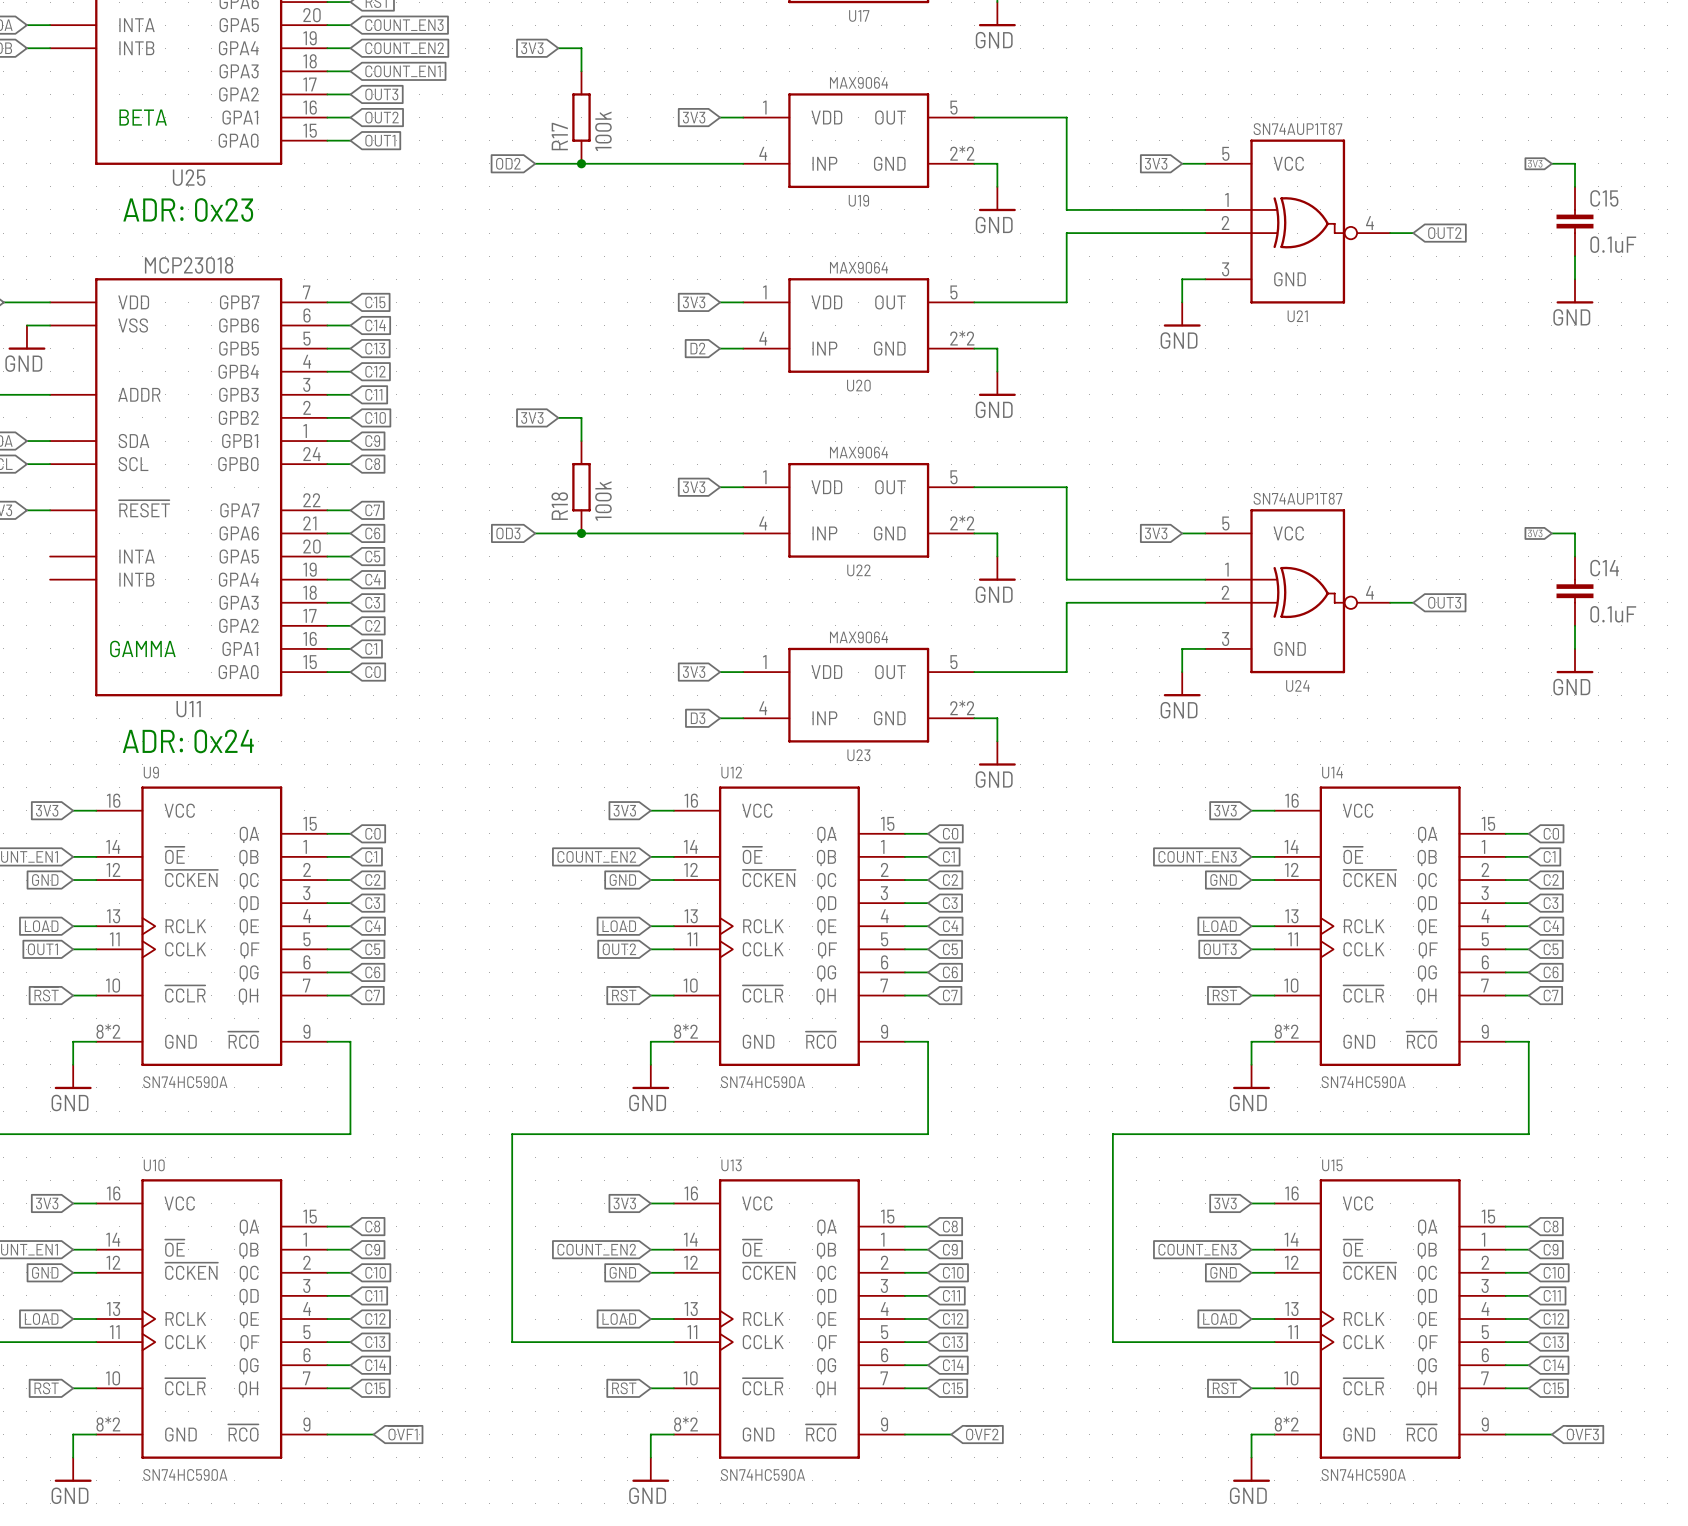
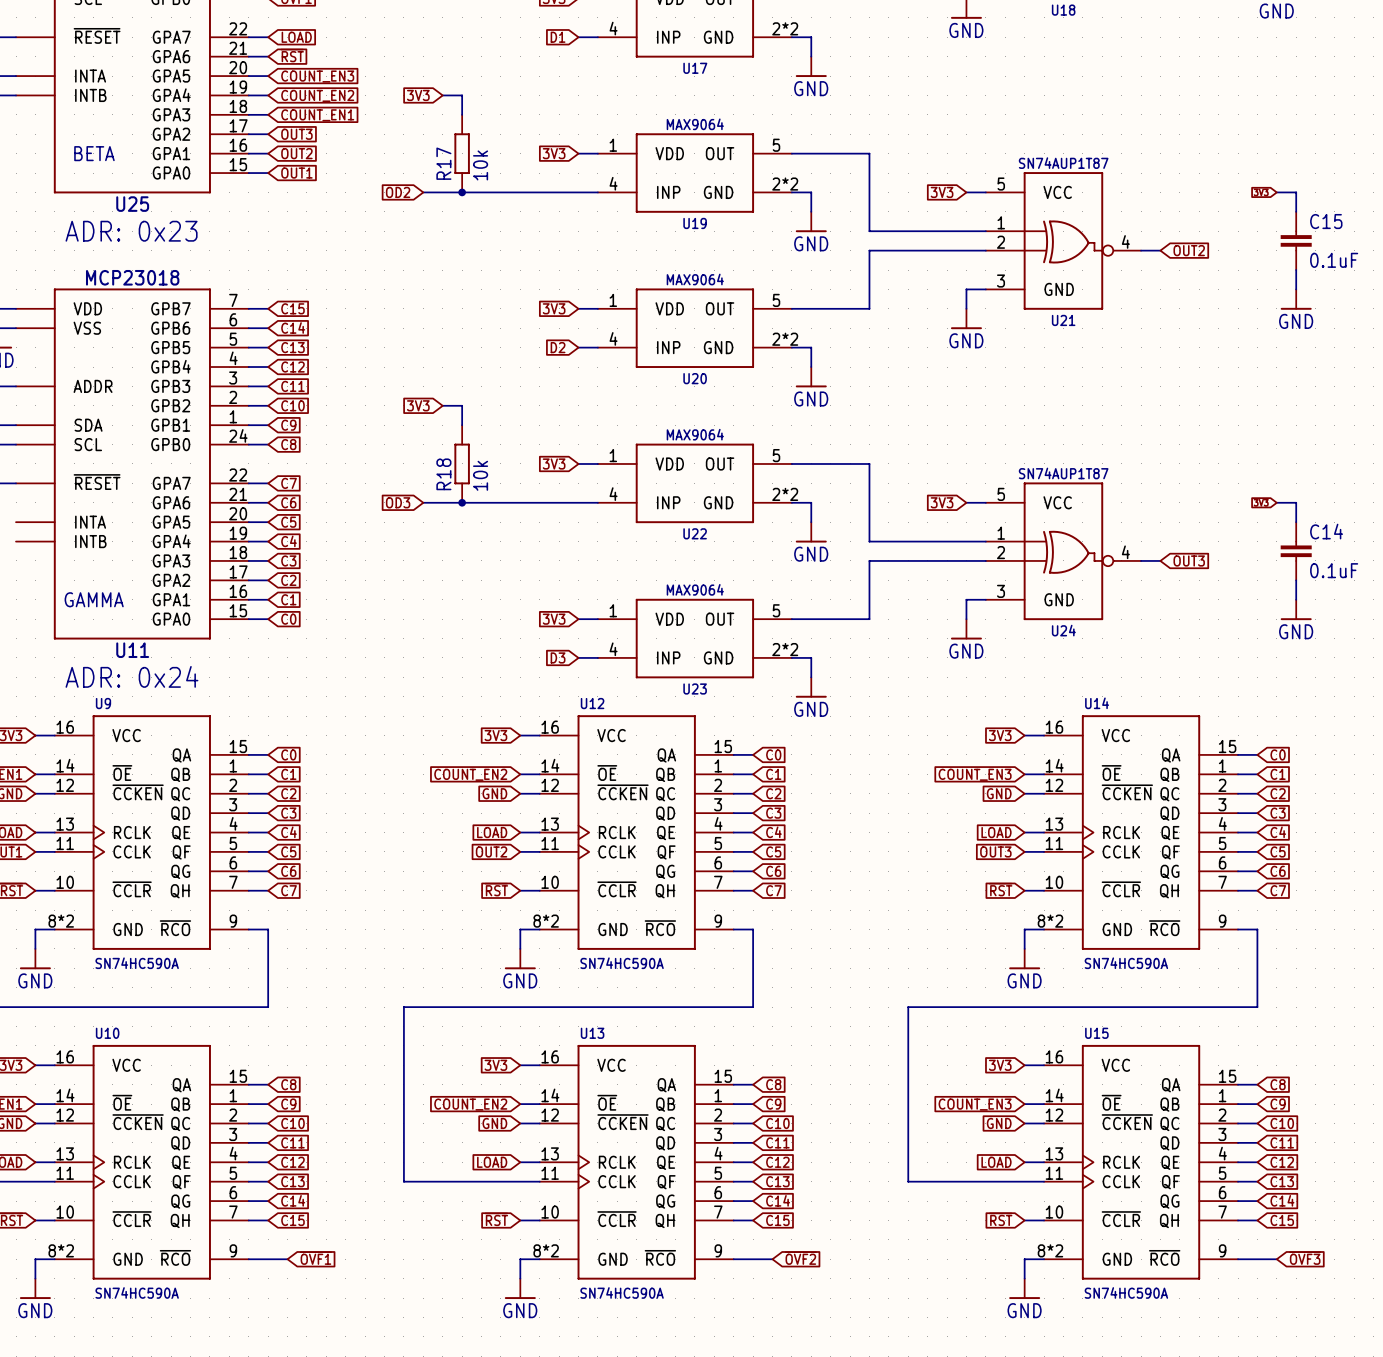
R17 value: 100k (603, 131) -> 10k (480, 165)
R18 value: 100k (603, 501) -> 10k (480, 475)

